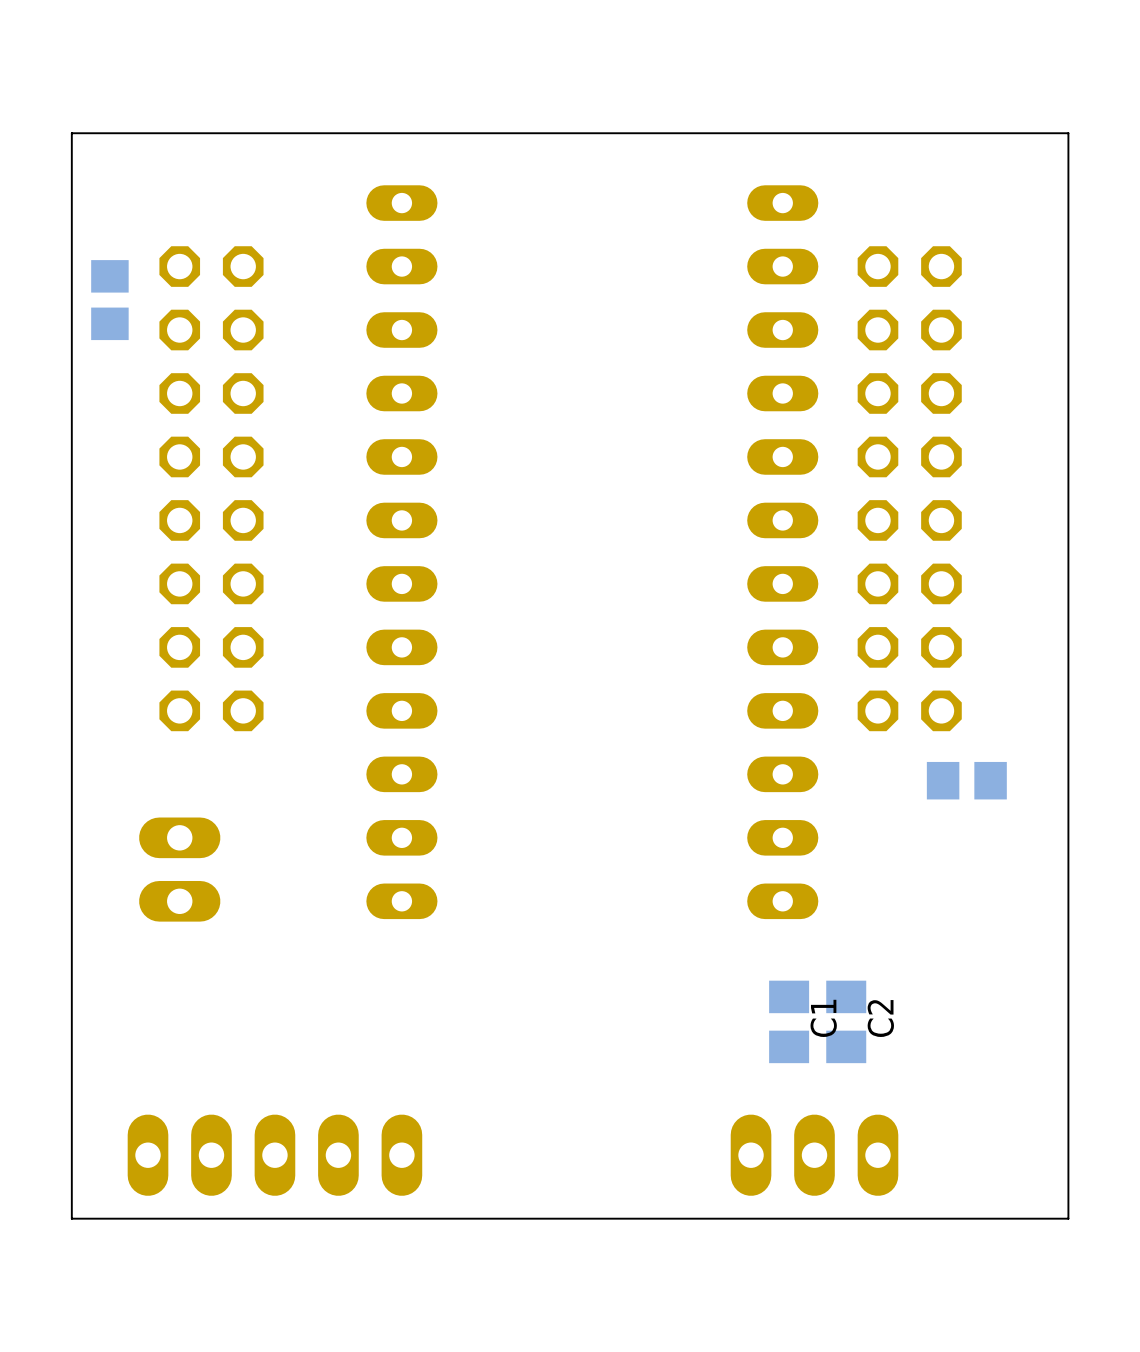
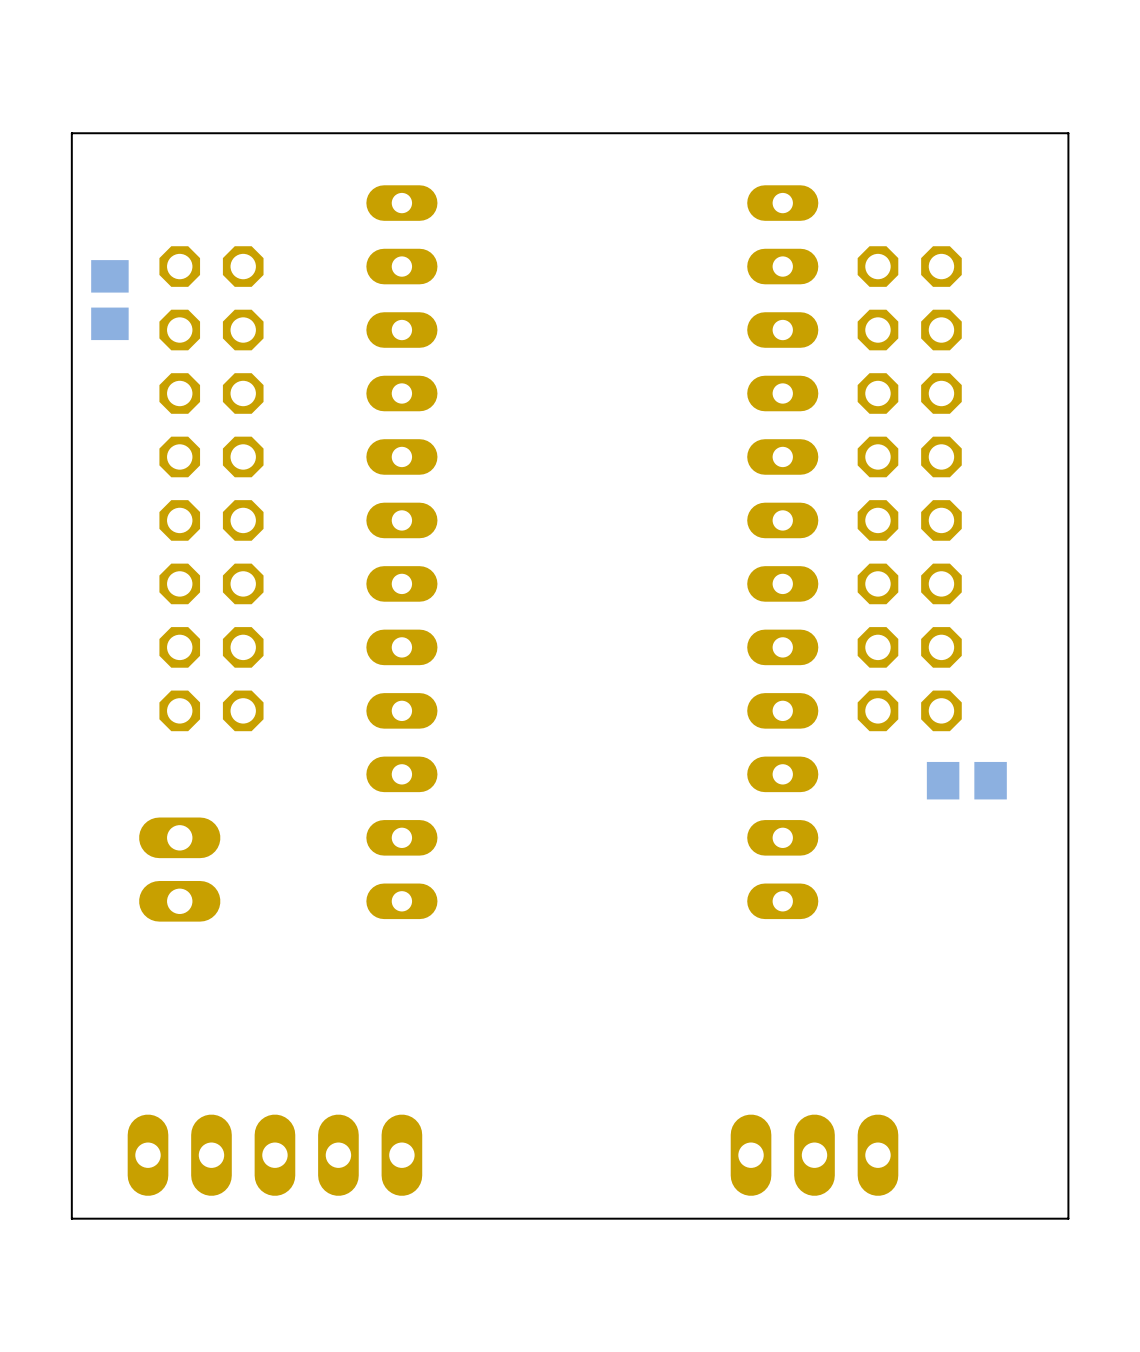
C1: (789, 1021) -> none
C2: (846, 1021) -> none

